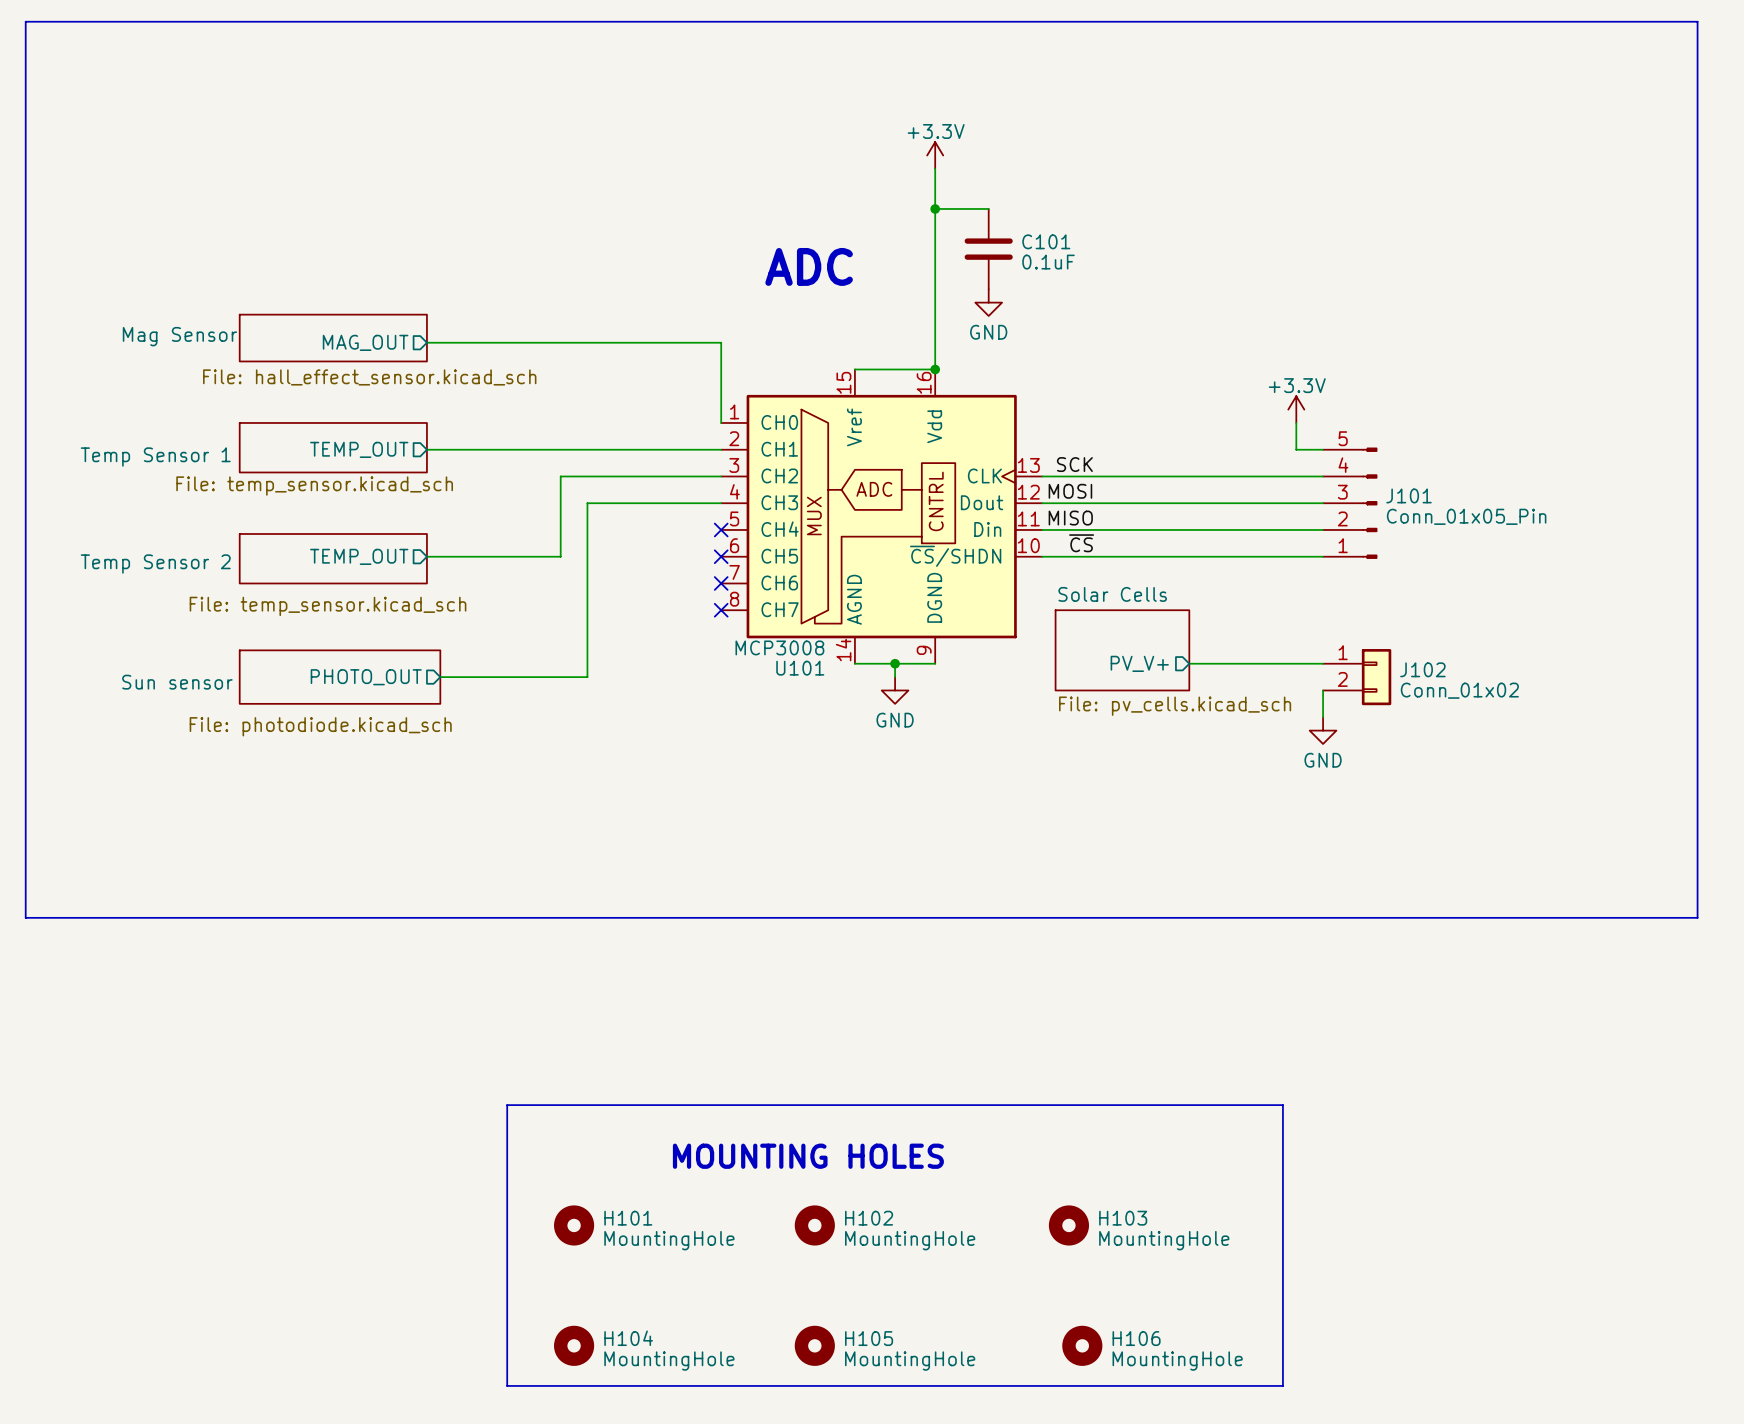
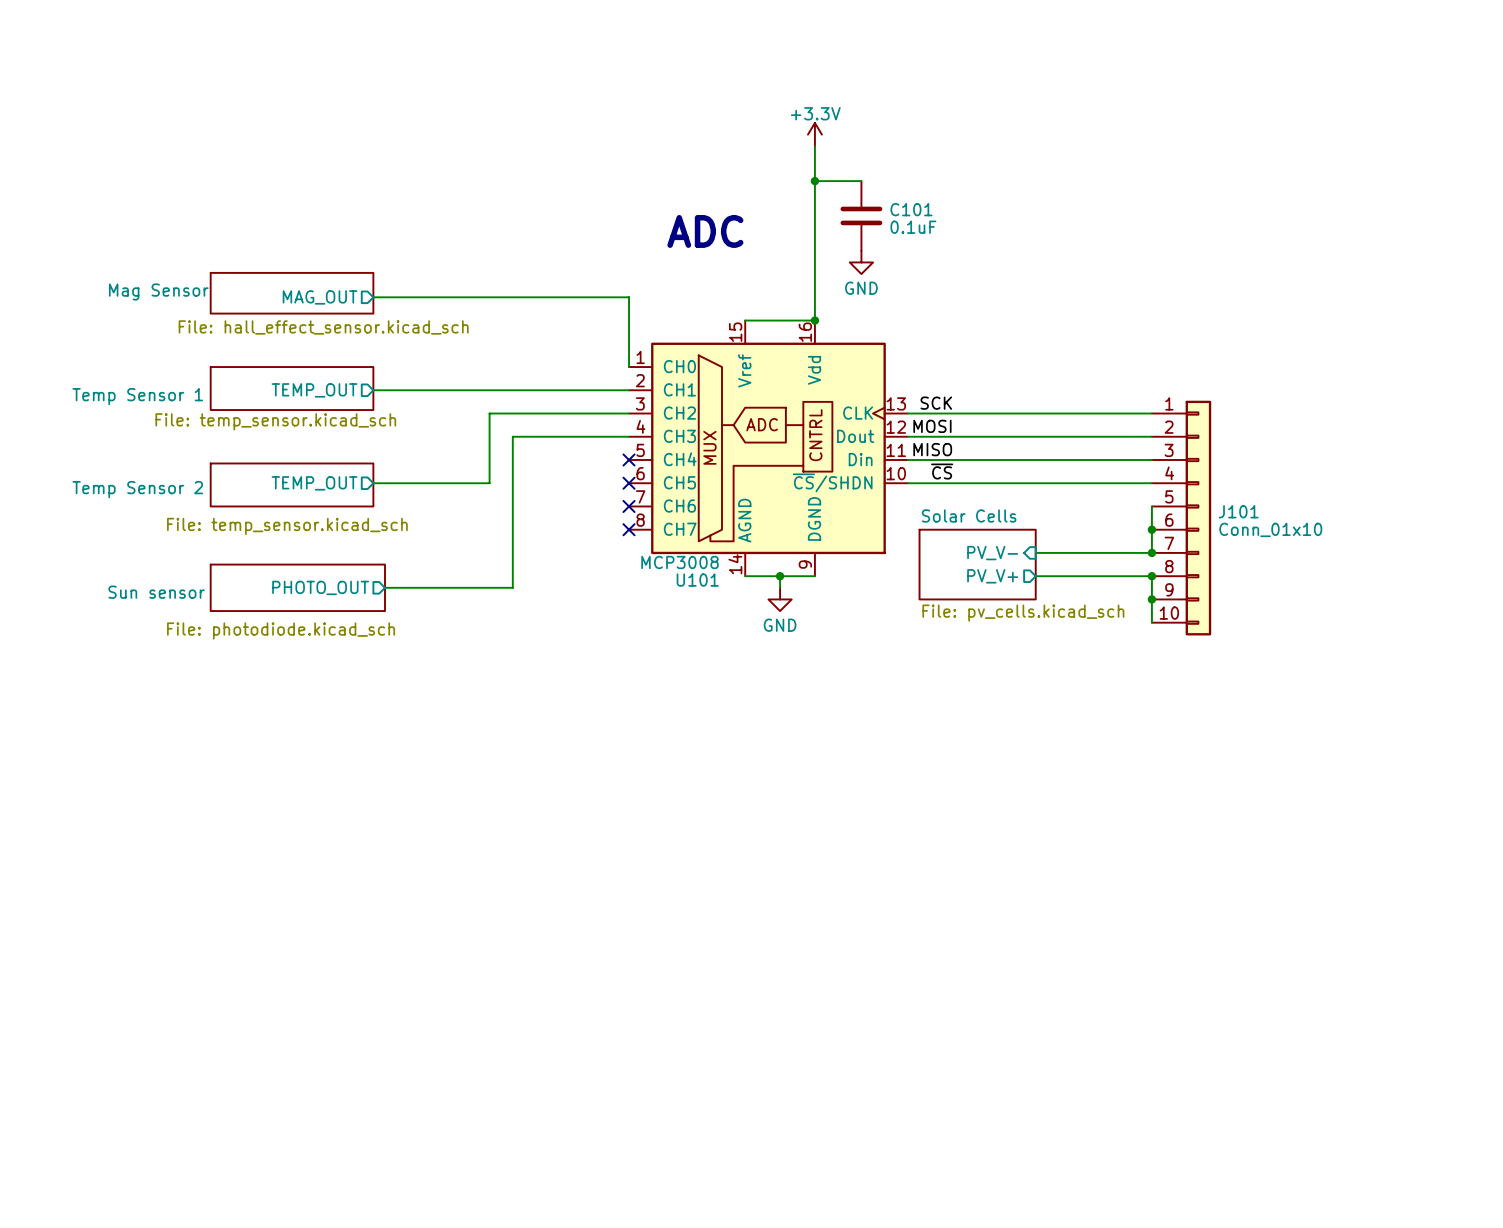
line: (25, 21) (1697, 21) (1697, 917) (25, 917) (25, 21) -> none
power symbol: +3.3V (1296, 409) -> none
wire: (1296, 422) (1296, 449) (1323, 449) -> none
J101 symbol: [1323, 447, 1378, 559] -> [1151, 400, 1212, 636]
J101 value: Conn_01x05_Pin (1466, 516) -> Conn_01x10 (1270, 529)
wire: none -> (1151, 506) (1151, 552) (1035, 552)
junction: none -> (1151, 529)
junction: none -> (1151, 552)
sheet pin: none -> PV_V- (992, 553)
wire: none -> (1151, 576) (1151, 599)
junction: none -> (1151, 576)
J102: Conn_01x02 (1357, 677) -> none
junction: none -> (1151, 599)
power symbol: GND (1323, 730) -> none
line: (507, 1105) (1282, 1105) (1282, 1385) (507, 1385) (507, 1105) -> none
text: MOUNTING HOLES (808, 1156) -> none
H101: MountingHole (574, 1225) -> none
H102: MountingHole (814, 1225) -> none
H103: MountingHole (1068, 1225) -> none
H104: MountingHole (574, 1345) -> none
H105: MountingHole (814, 1345) -> none
H106: MountingHole (1082, 1345) -> none

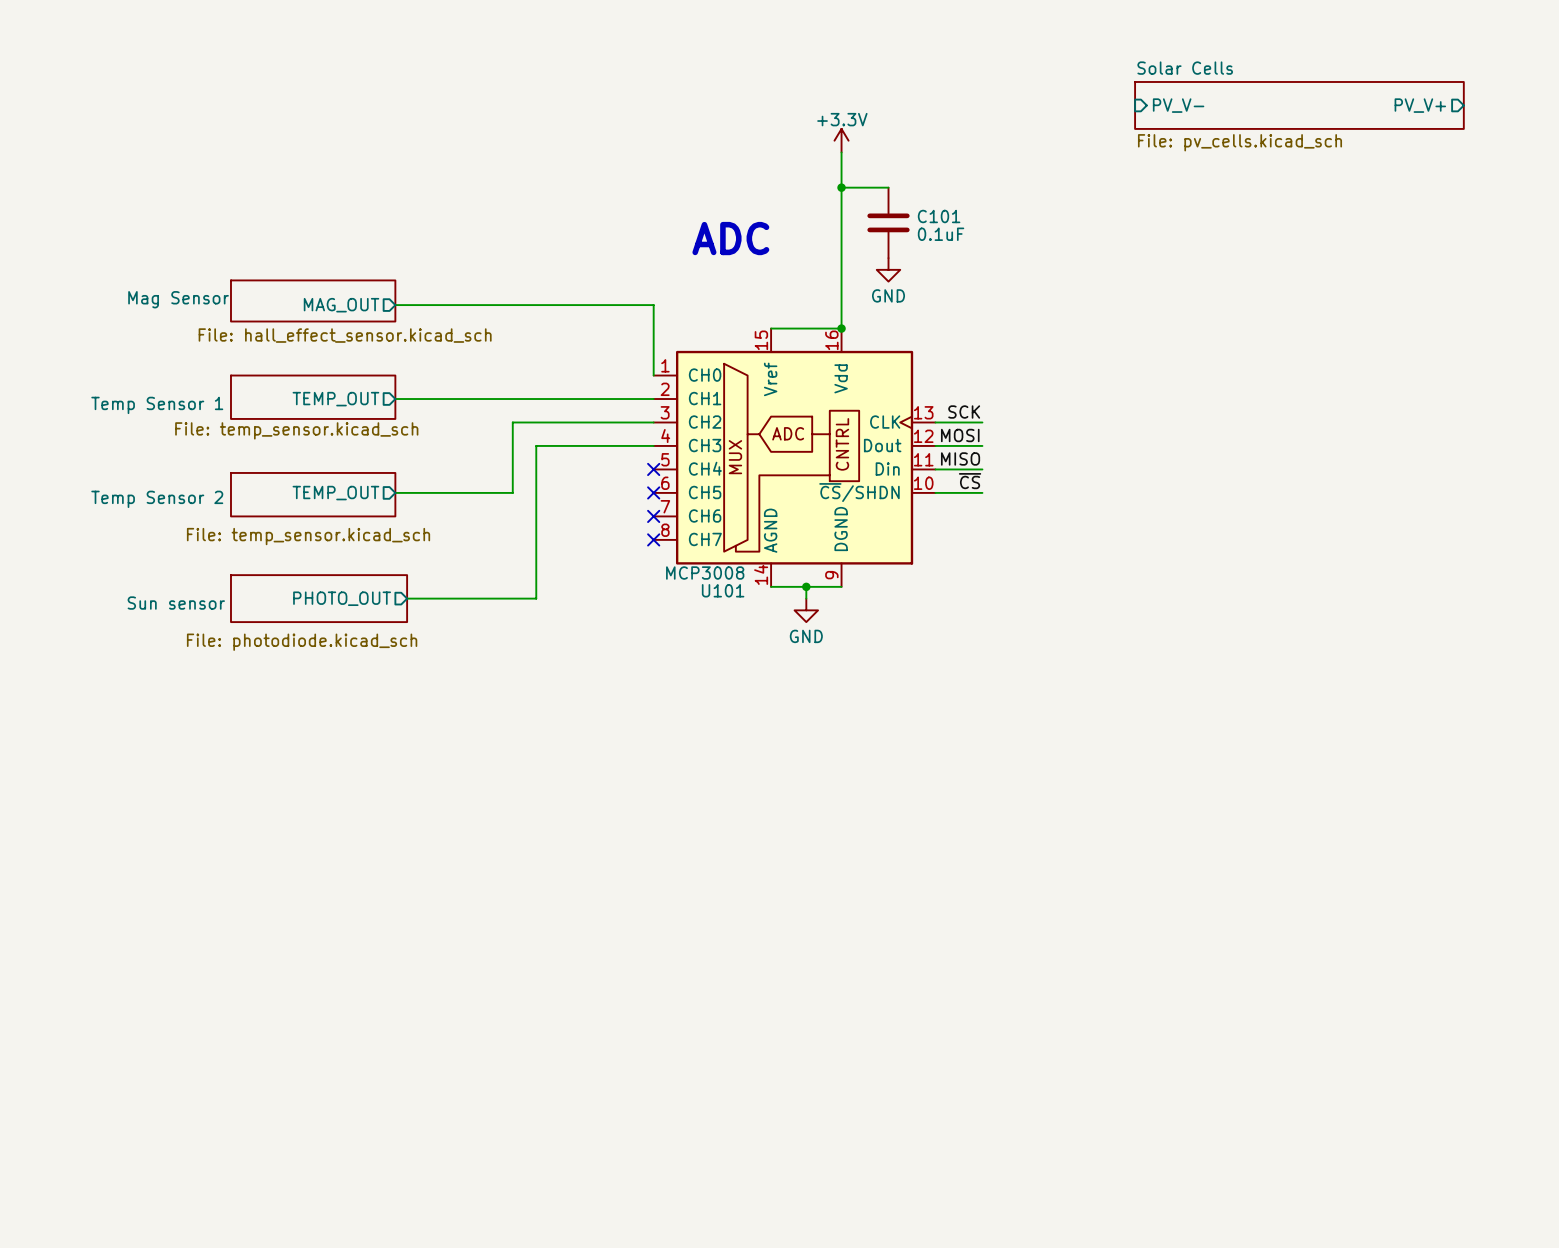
sheet pin: none -> PV_V- (1178, 105)
sheet Solar Cells: none -> File: pv_cells.kicad_sch (1299, 105)
sheet pin: none -> PV_V+ (1420, 105)
wire: (954, 413) (1151, 413) -> none
wire: (954, 436) (1151, 436) -> none
wire: (954, 459) (1151, 459) -> none
wire: (954, 483) (1151, 483) -> none
wire: (1151, 506) (1151, 552) (1035, 552) -> none
J101: Conn_01x10 (1181, 518) -> none
junction: (1151, 529) -> none
junction: (1151, 552) -> none
sheet pin: PV_V- (992, 553) -> none
sheet Solar Cells: File: pv_cells.kicad_sch (977, 564) -> none
sheet pin: PV_V+ (992, 576) -> none
wire: (1035, 576) (1151, 576) (1151, 622) -> none
junction: (1151, 576) -> none
junction: (1151, 599) -> none

